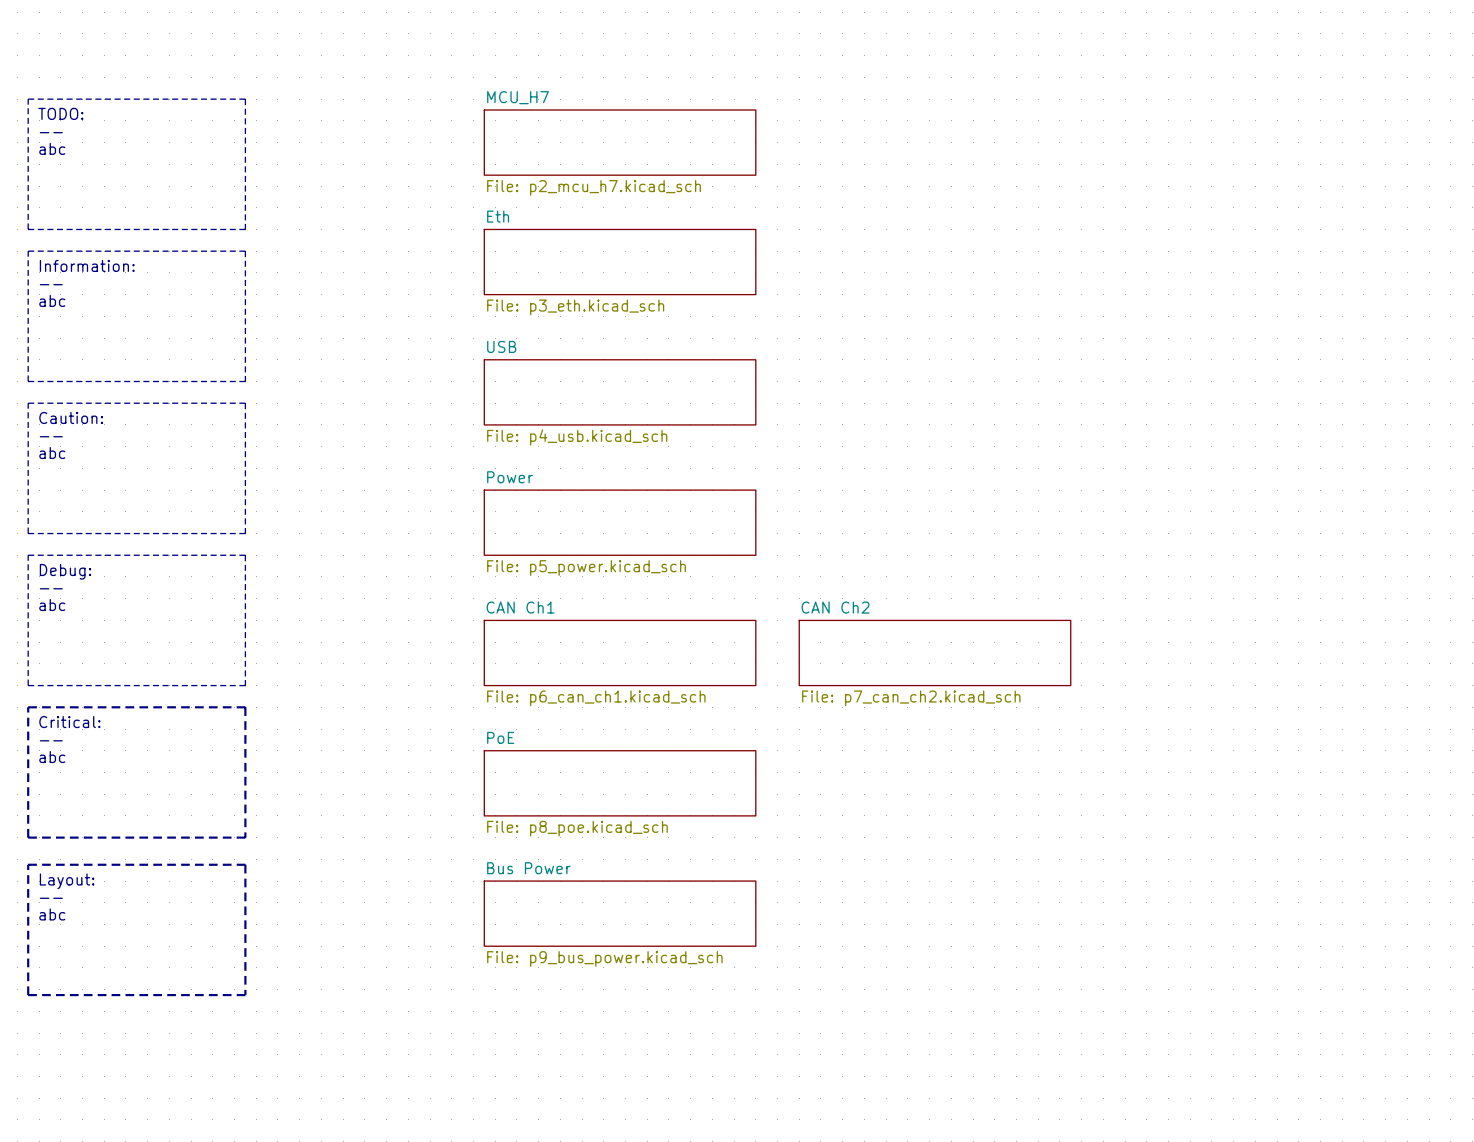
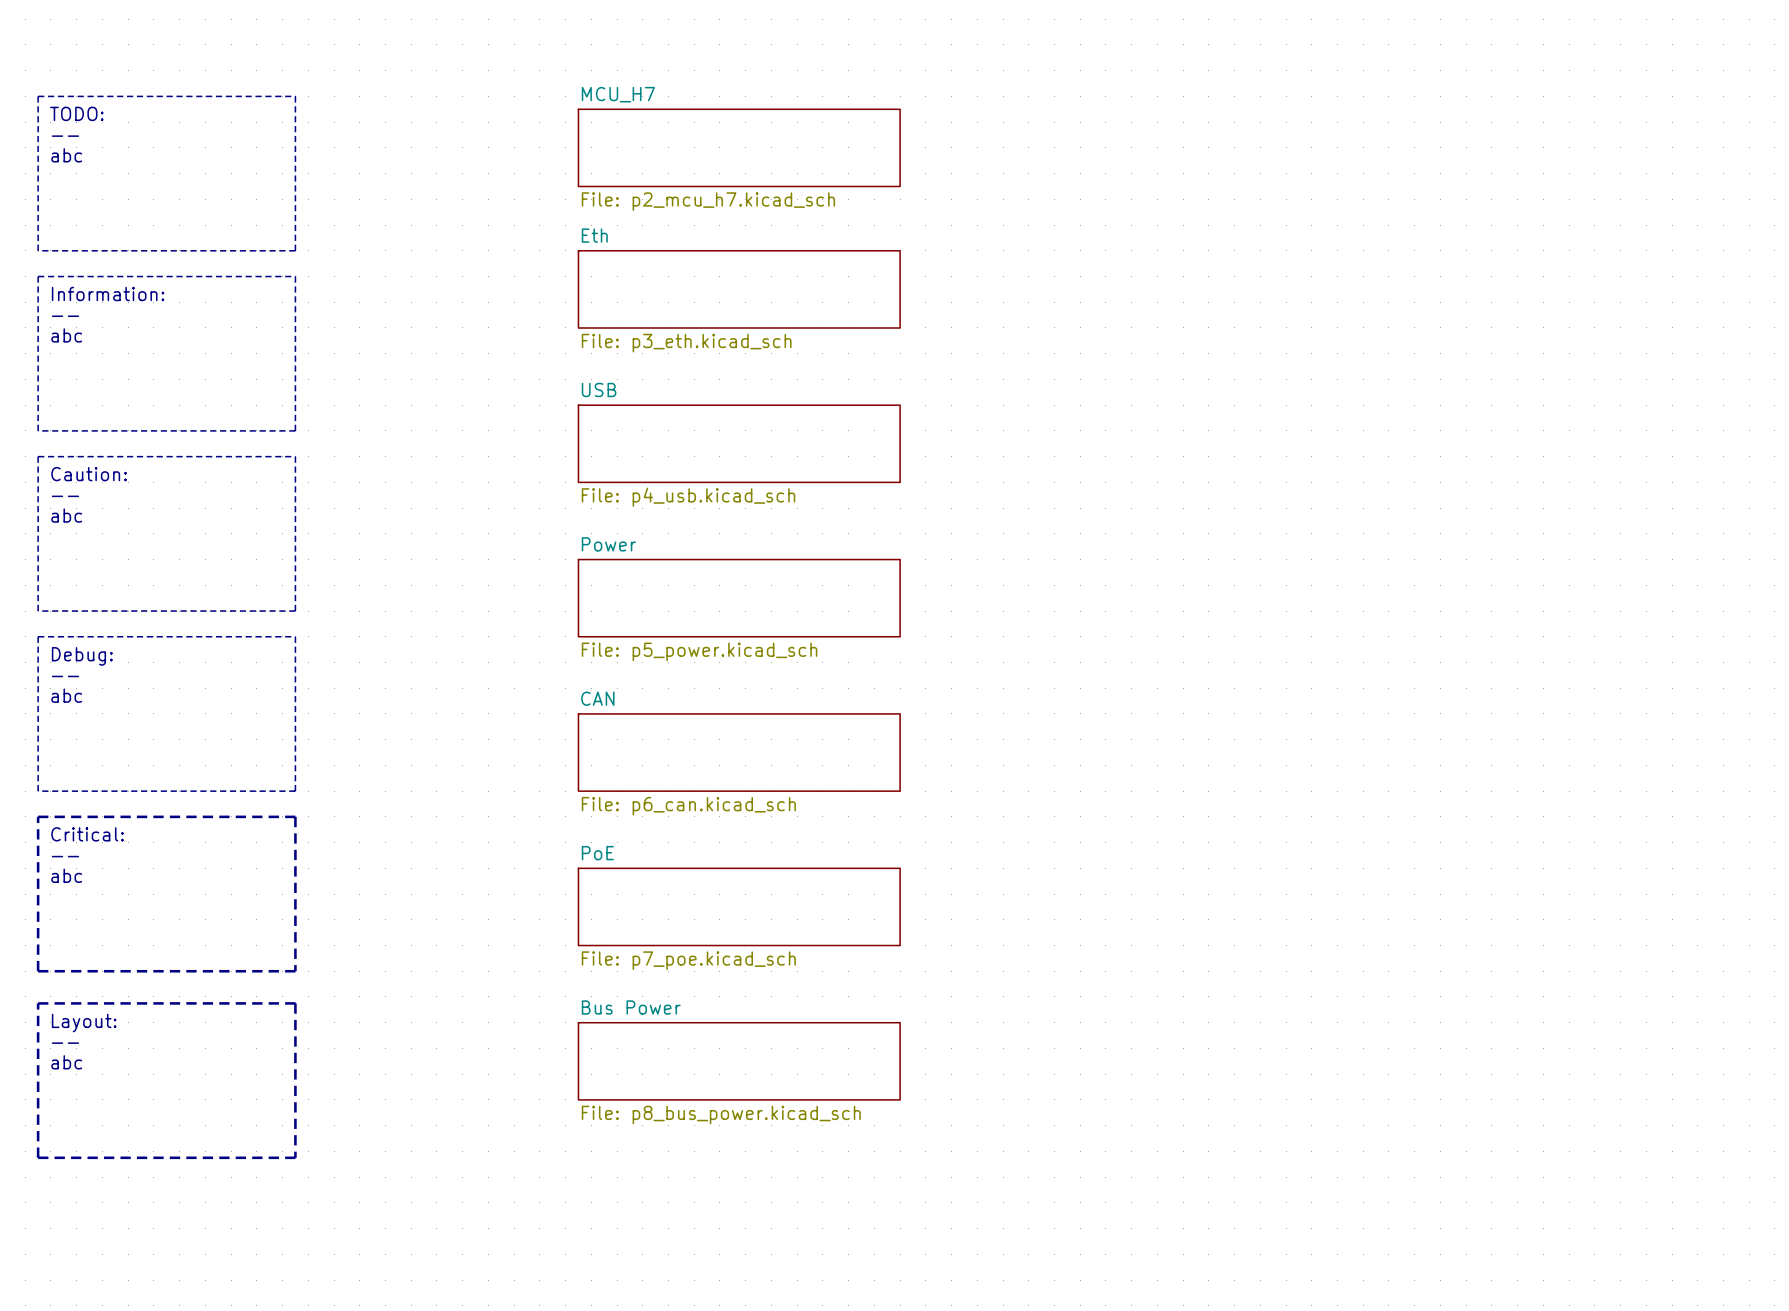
sheet CAN Ch1 name: CAN Ch1 (520, 607) -> CAN (597, 698)
sheet CAN Ch2: File: p7_can_ch2.kicad_sch (934, 653) -> none
sheet CAN Ch1 value: File: p6_can_ch1.kicad_sch (596, 698) -> File: p6_can.kicad_sch (688, 806)
sheet PoE value: File: p8_poe.kicad_sch (577, 828) -> File: p7_poe.kicad_sch (688, 960)
sheet Bus Power value: File: p9_bus_power.kicad_sch (604, 958) -> File: p8_bus_power.kicad_sch (721, 1115)

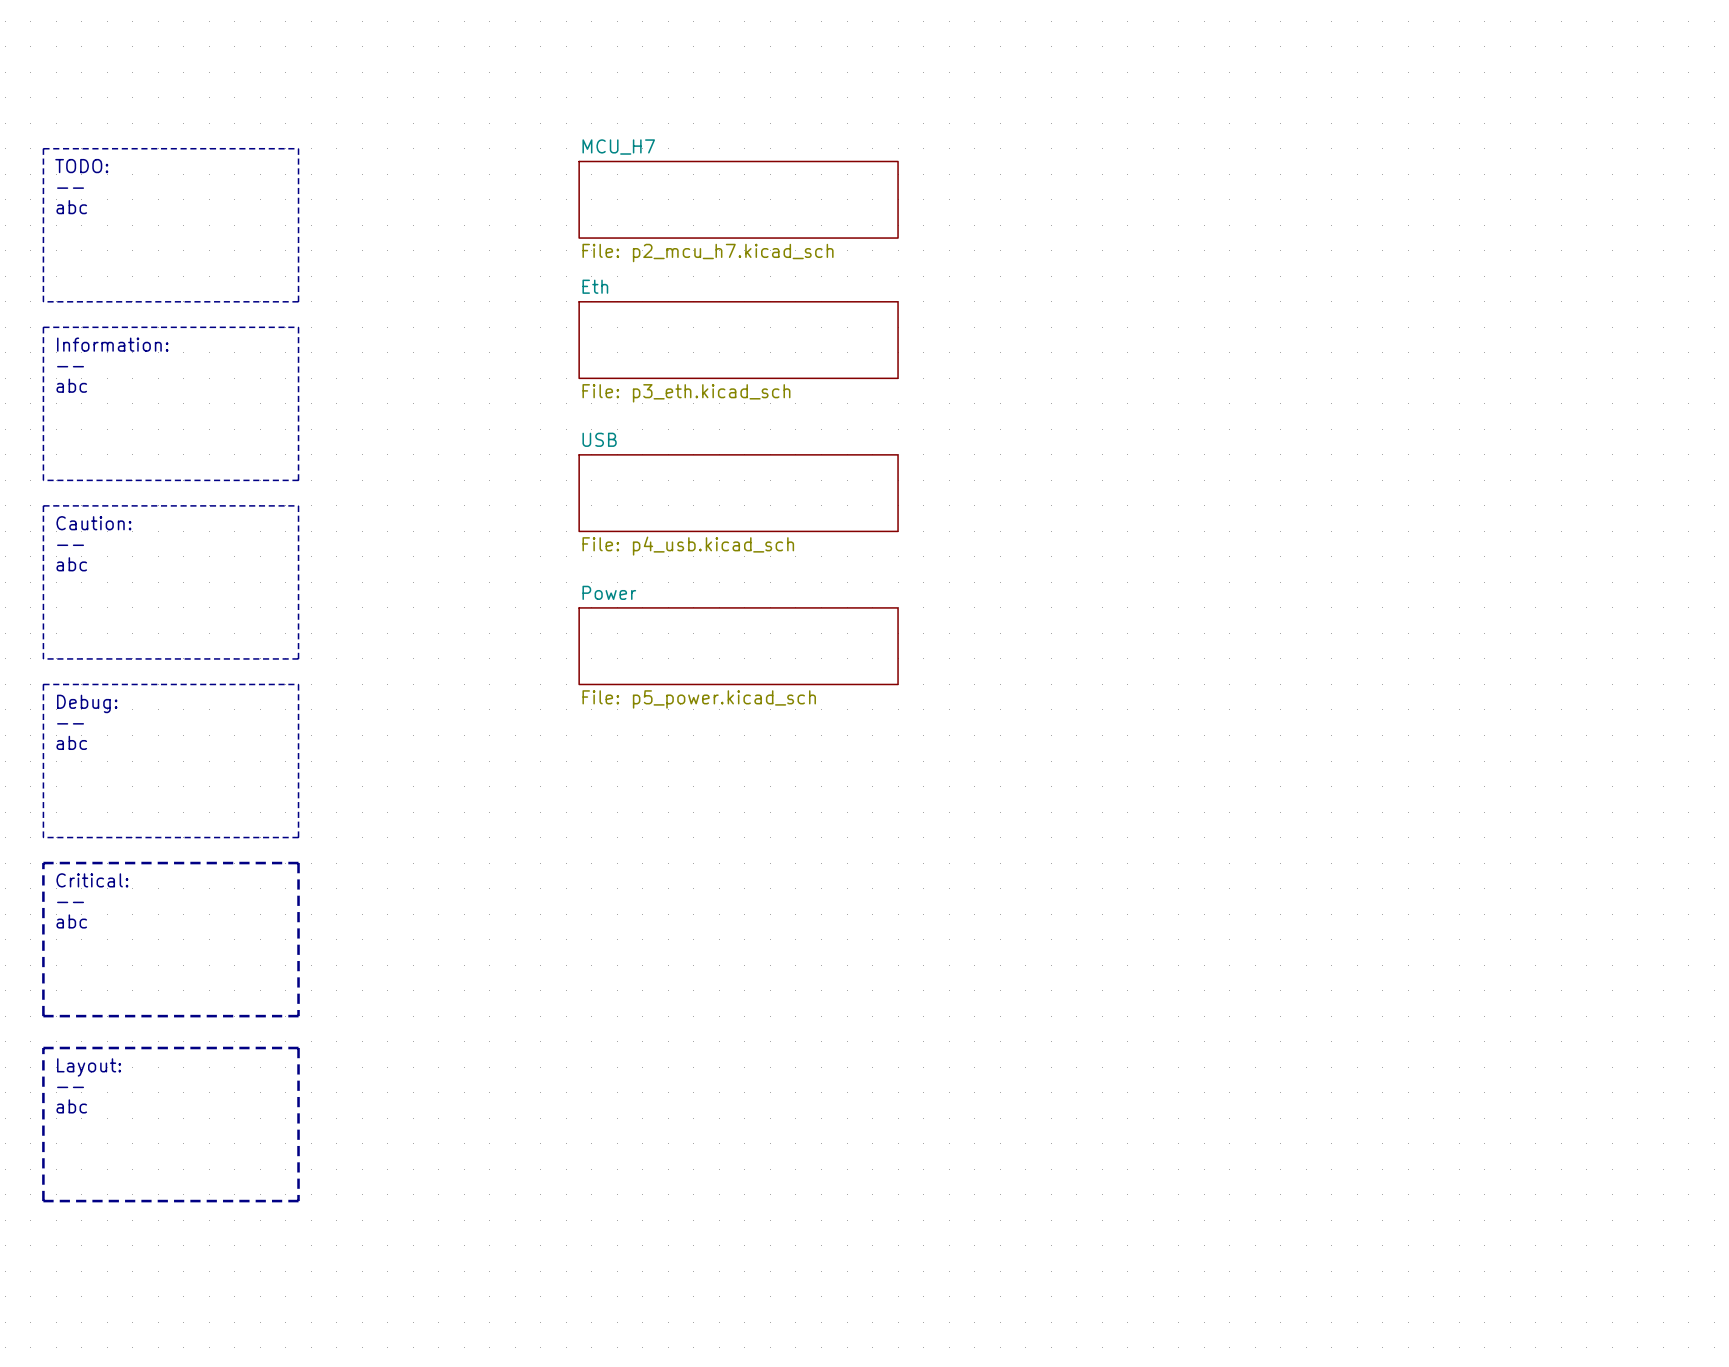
sheet CAN: File: p6_can.kicad_sch (739, 752) -> none
sheet PoE: File: p7_poe.kicad_sch (739, 906) -> none
sheet Bus Power: File: p8_bus_power.kicad_sch (739, 1061) -> none

